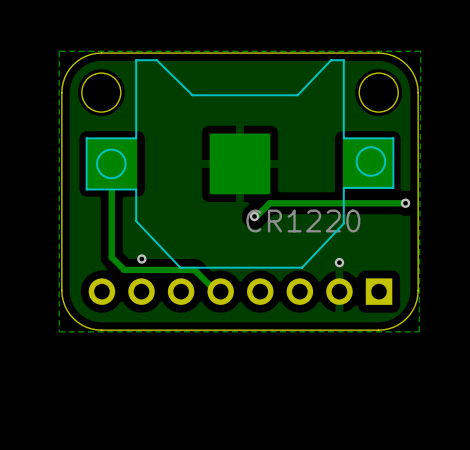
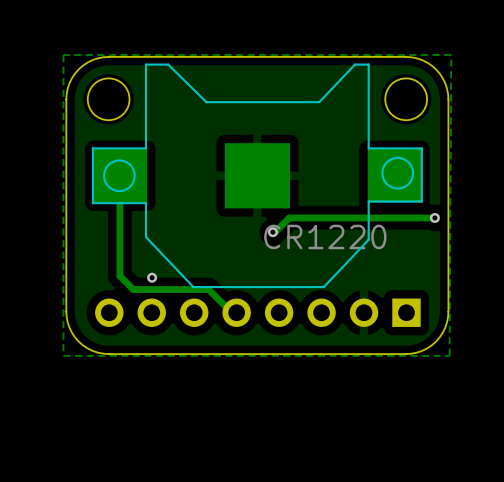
via: (339, 262) -> none

